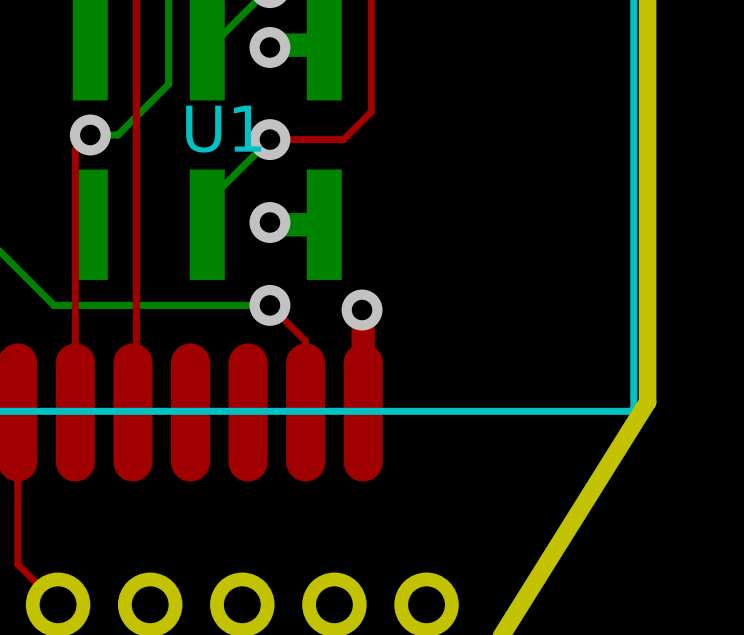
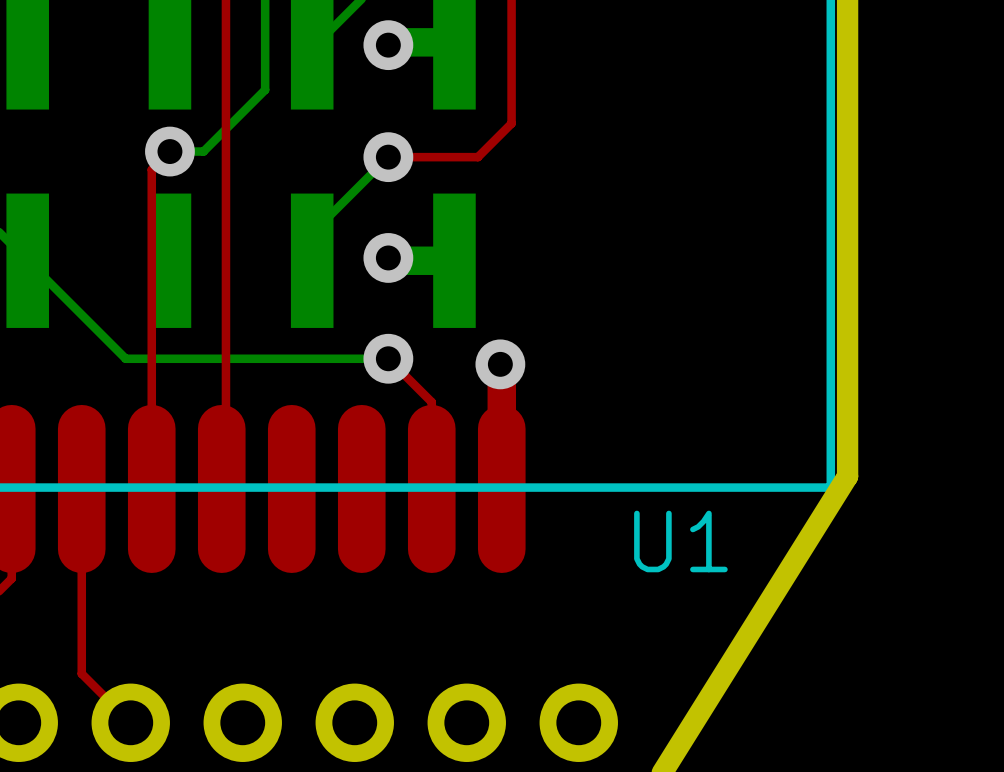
U1 name position: U1 (223, 129) -> U1 (680, 541)

